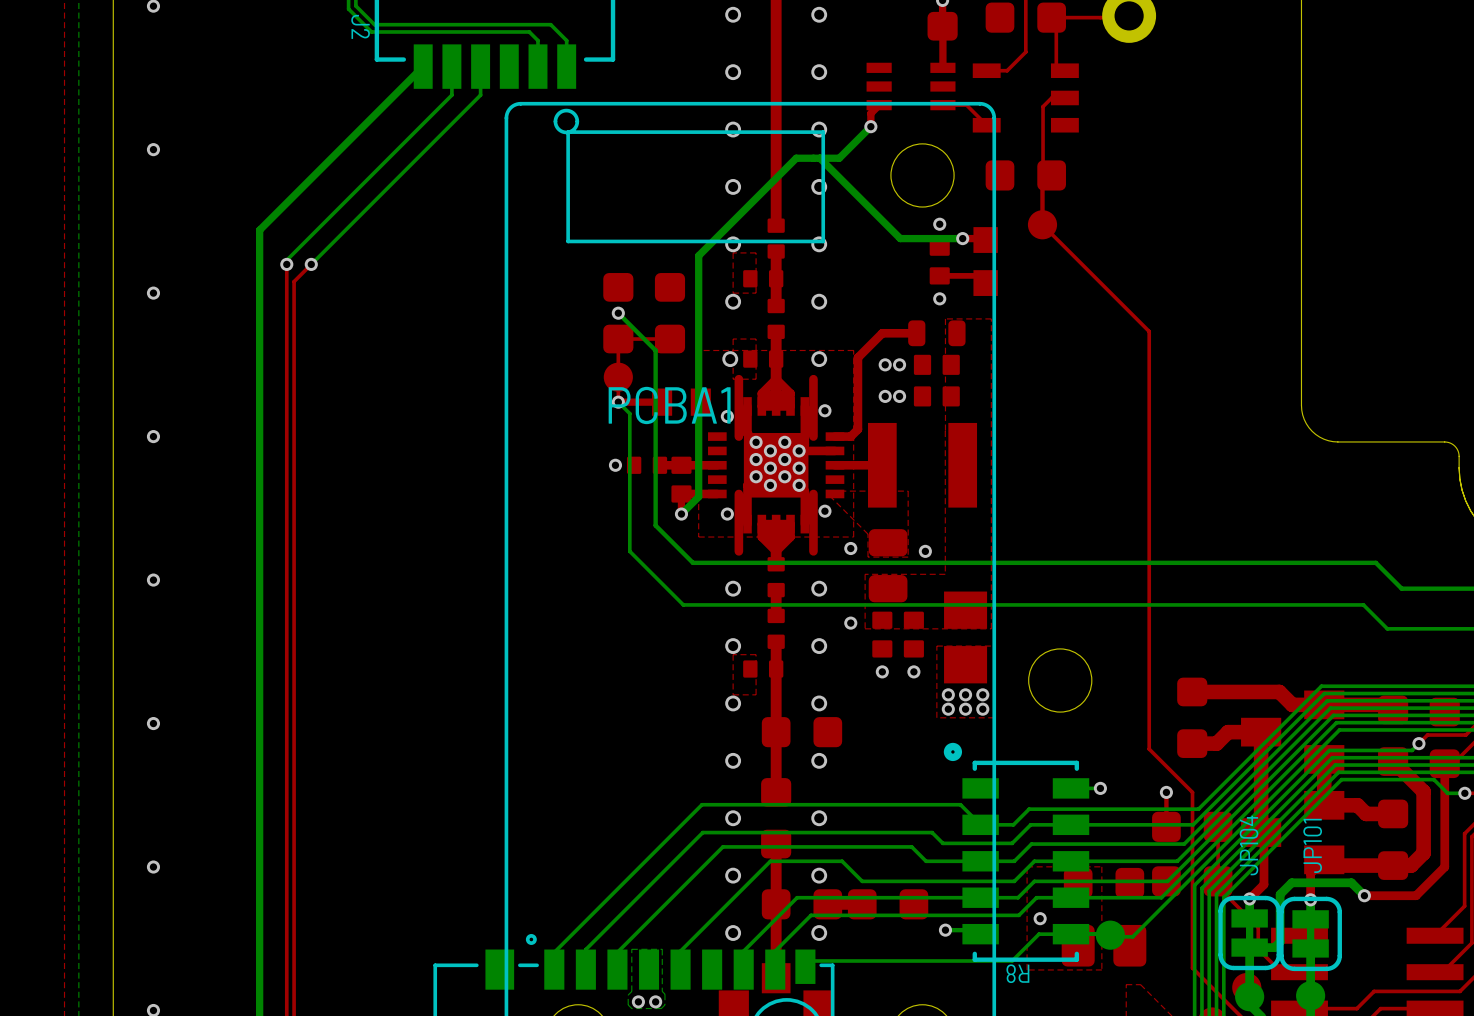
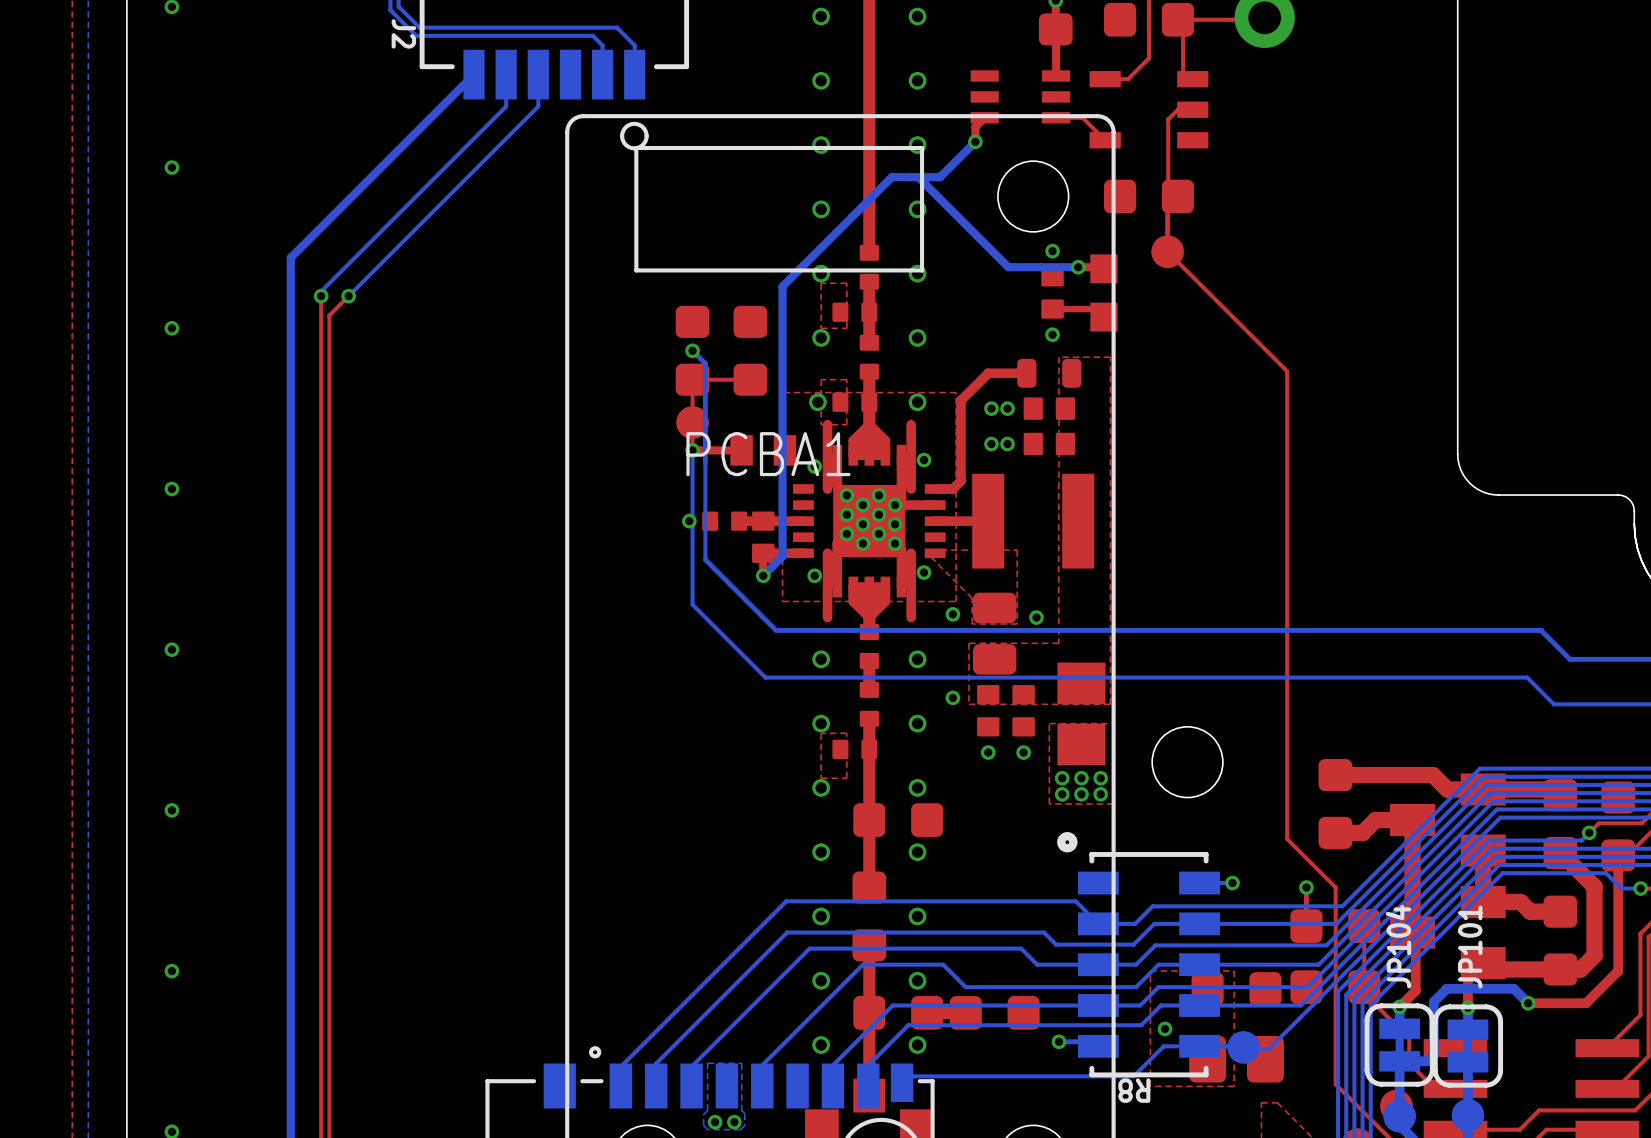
bottom track: (629, 324) (655, 350) (655, 525) -> none
bottom track: (618, 402) (629, 413) -> (705, 363) (705, 463)
bottom track: none -> (692, 450) (692, 604) (705, 617)
bottom track: (629, 499) (629, 551) -> (705, 559) (734, 588)

